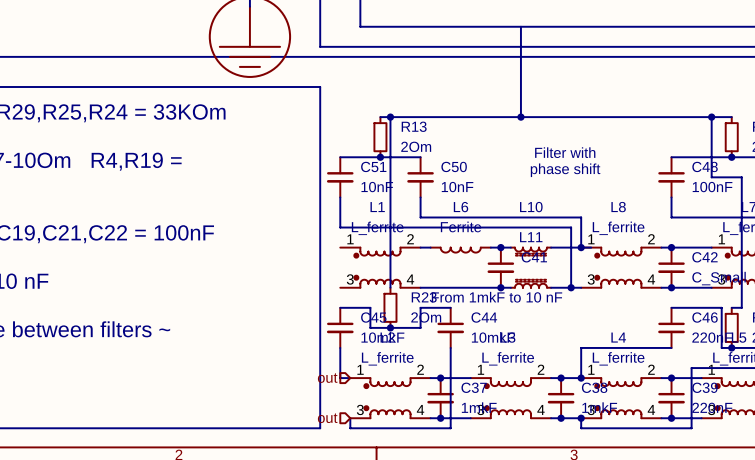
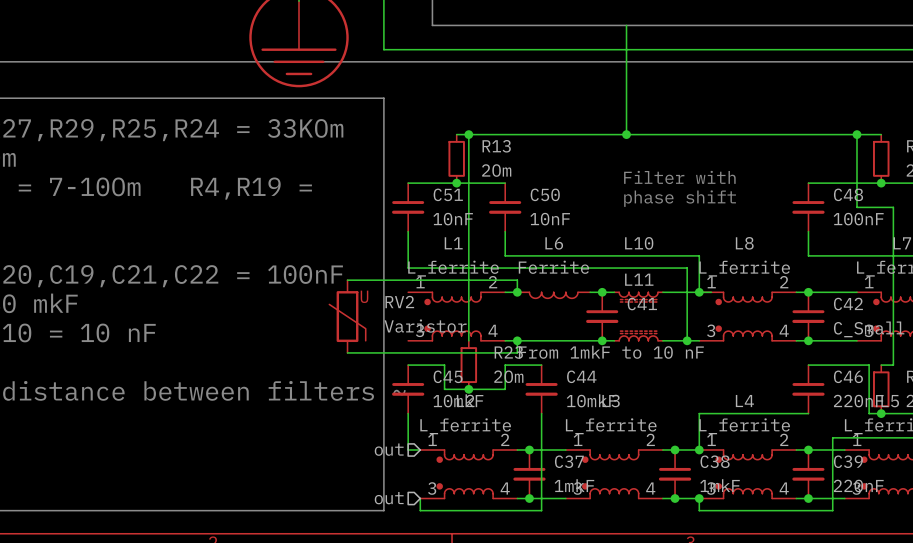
wire: none -> (347, 280) (517, 280) (517, 292)
junction: none -> (517, 292)
RV2: none -> Varistor (347, 316)
wire: none -> (517, 340) (517, 352) (347, 352)
junction: none -> (517, 340)

